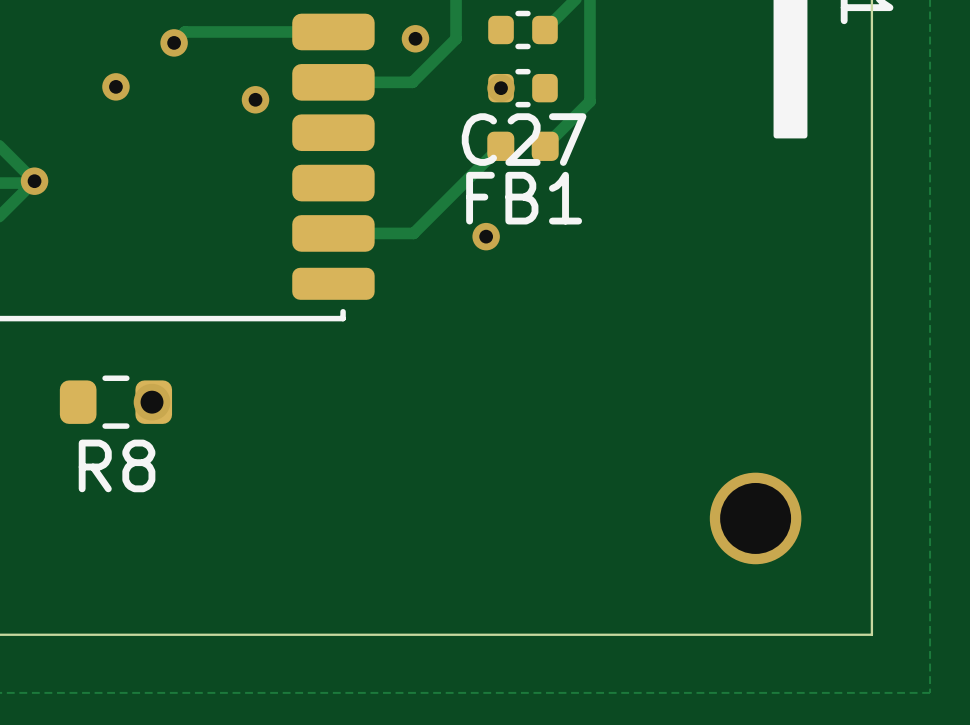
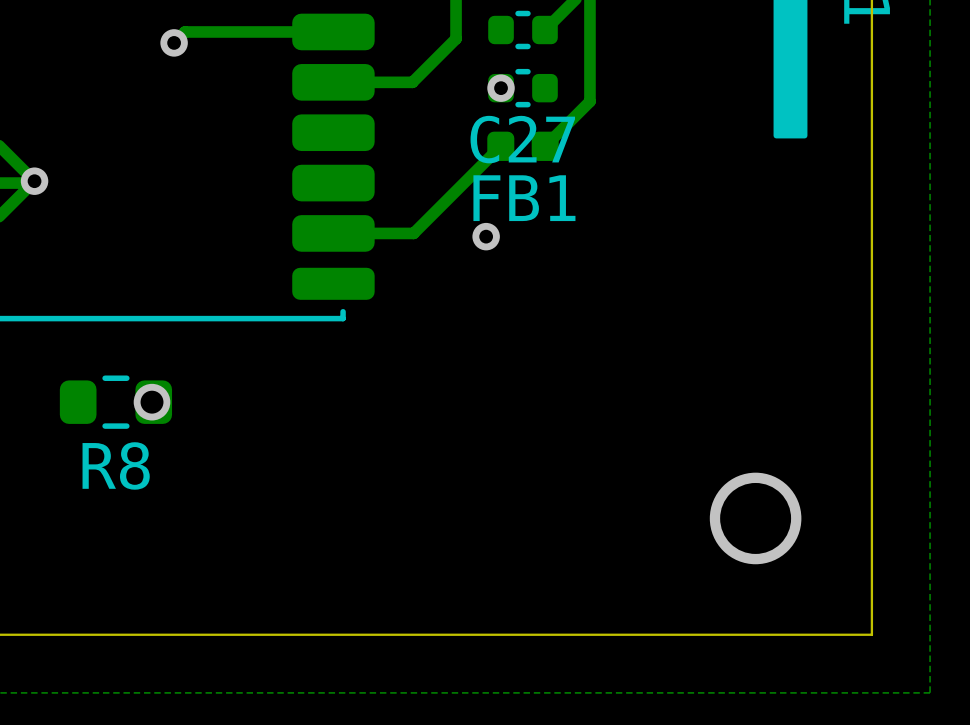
via: (415, 38) -> none
via: (115, 86) -> none
via: (255, 99) -> none

